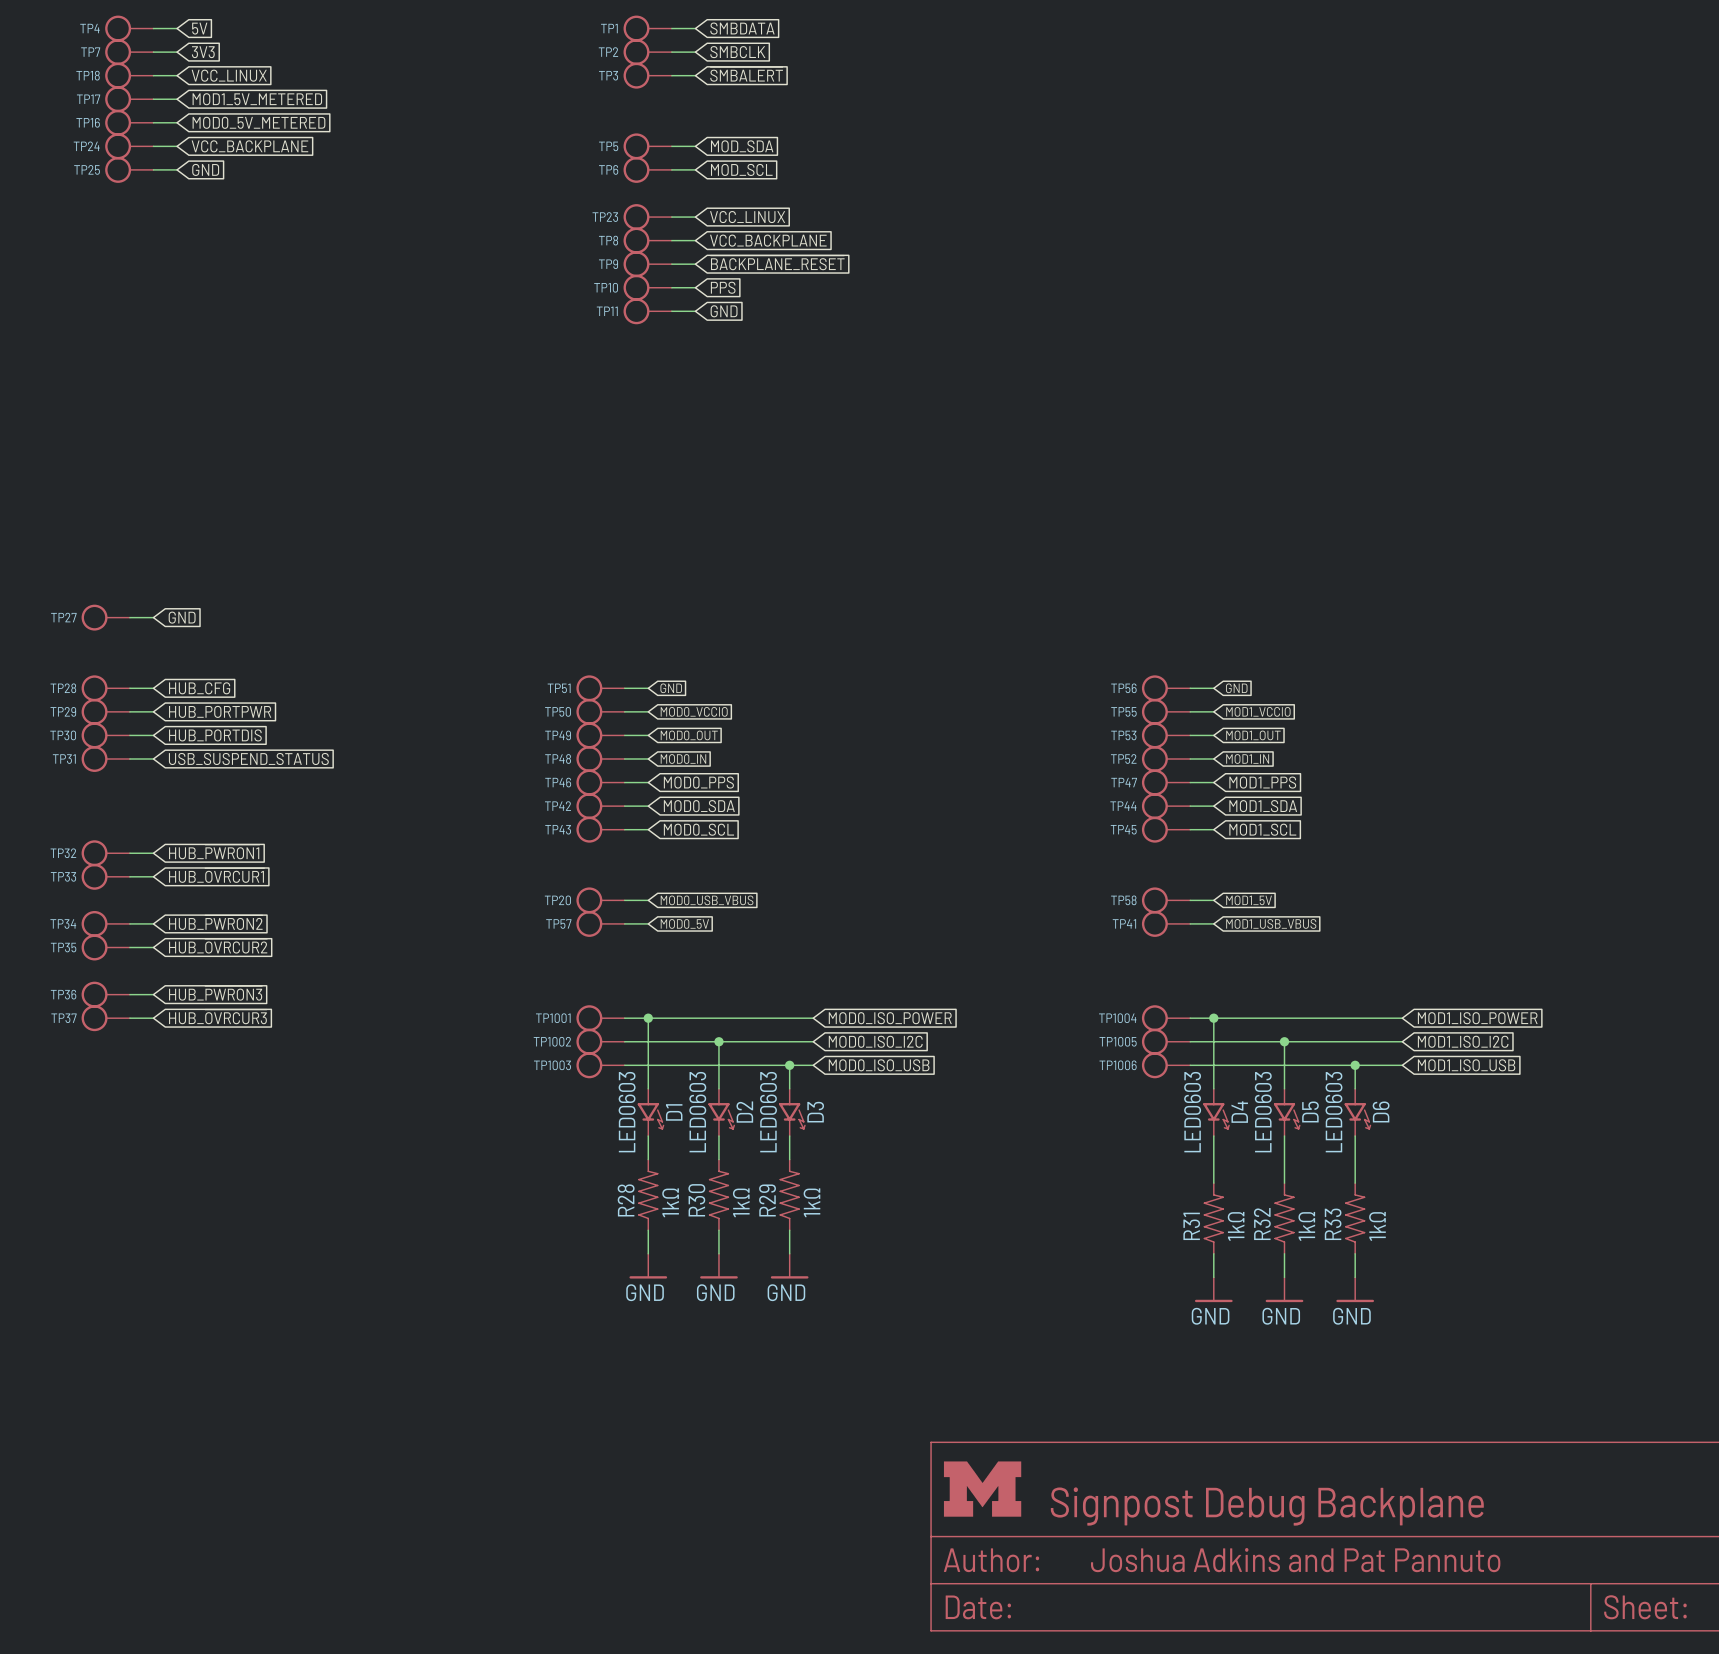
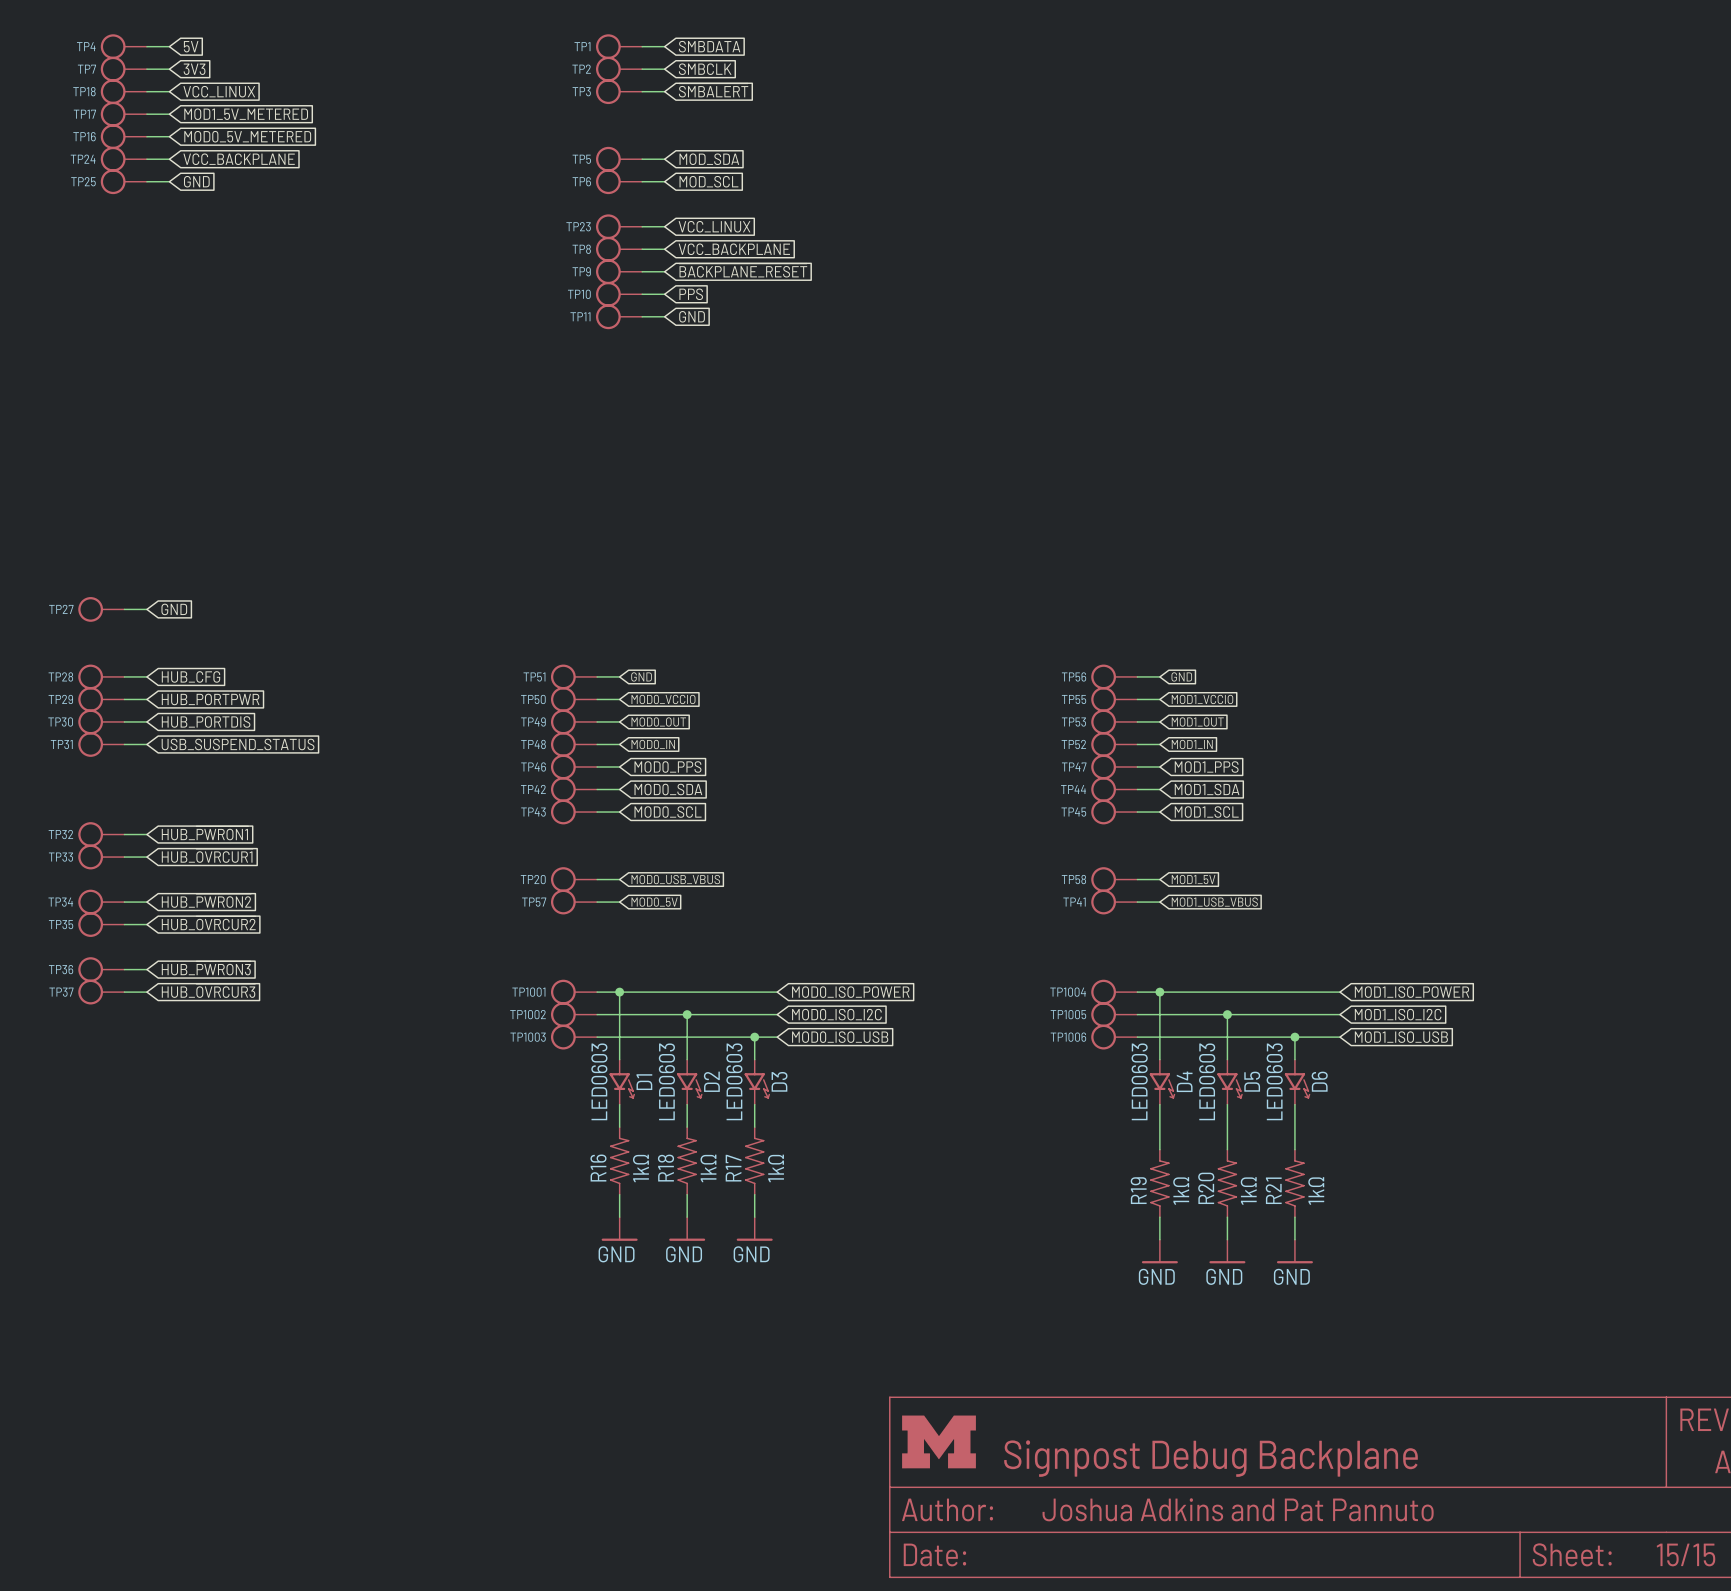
R28 name: R28 (626, 1200) -> R16 (598, 1168)
R30 name: R30 (696, 1200) -> R18 (665, 1168)
R29 name: R29 (767, 1200) -> R17 (733, 1168)
R32 name: R32 (1262, 1224) -> R20 (1206, 1188)
R33 name: R33 (1333, 1224) -> R21 (1273, 1190)
R31 name: R31 (1191, 1226) -> R19 (1138, 1190)

